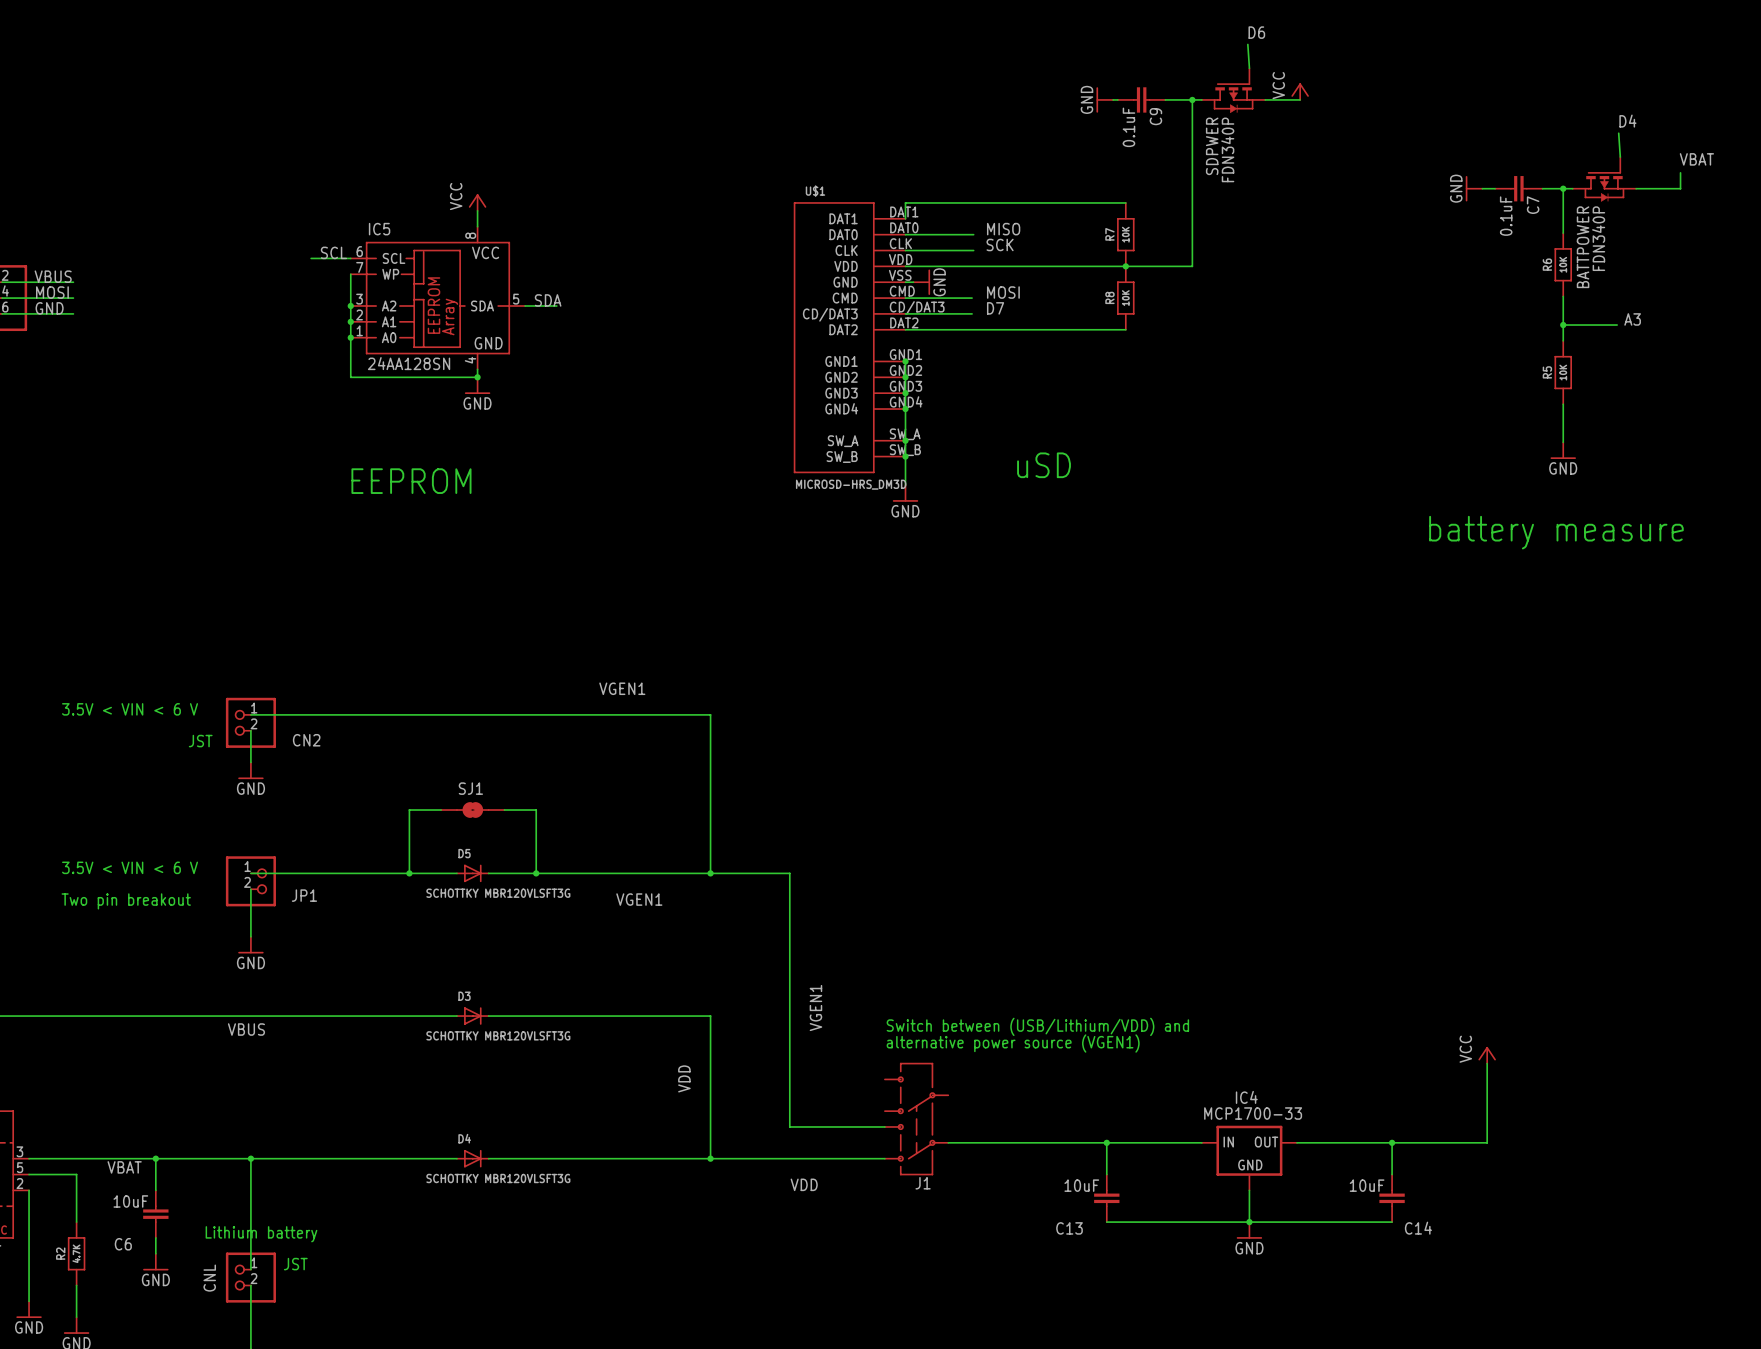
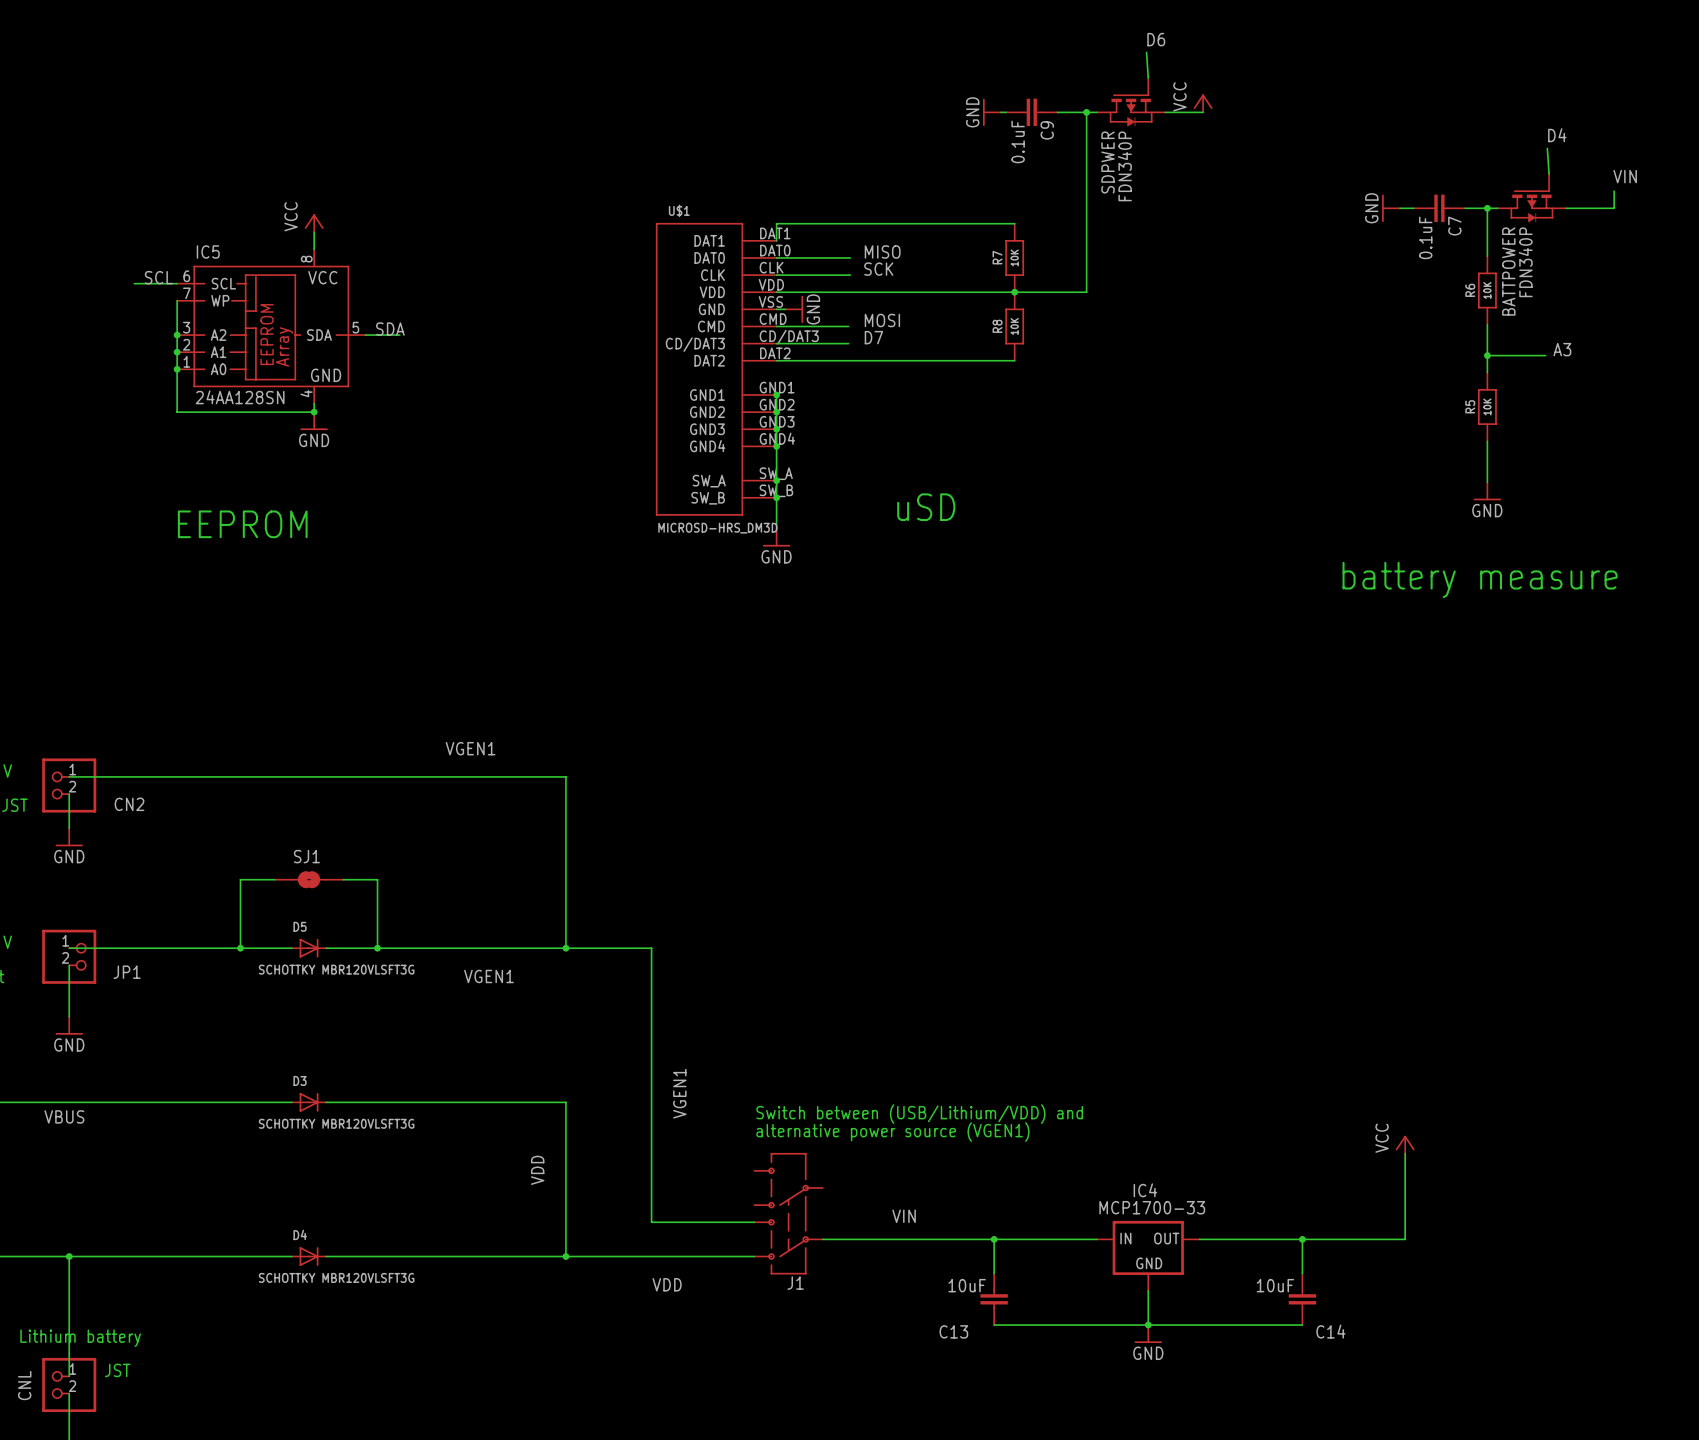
label: VBAT (1696, 159) -> VIN (1625, 176)
label: none -> VIN (904, 1216)

